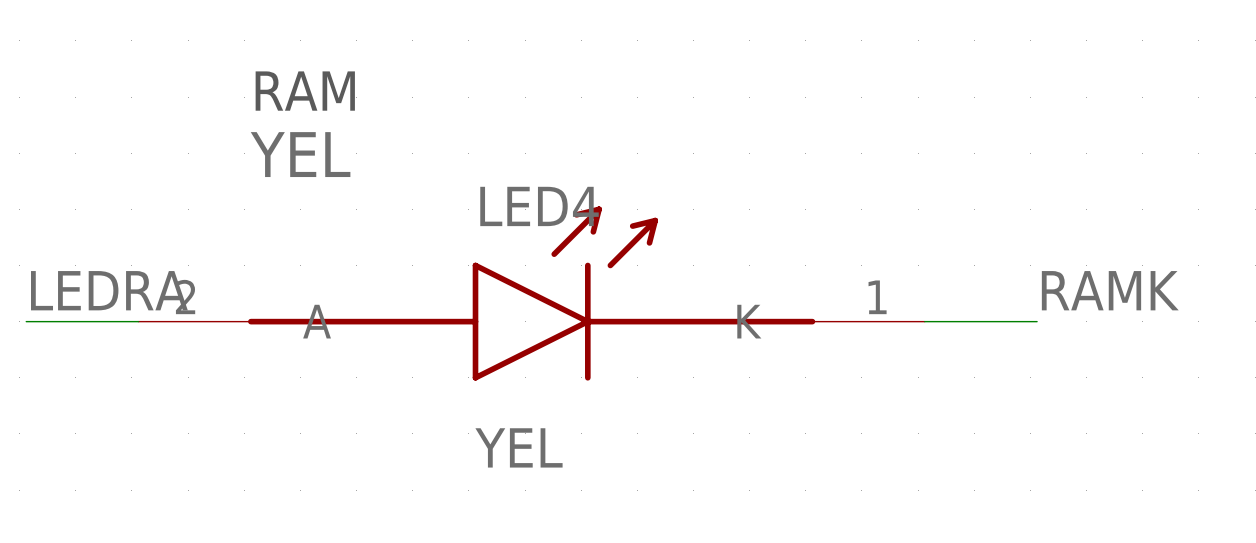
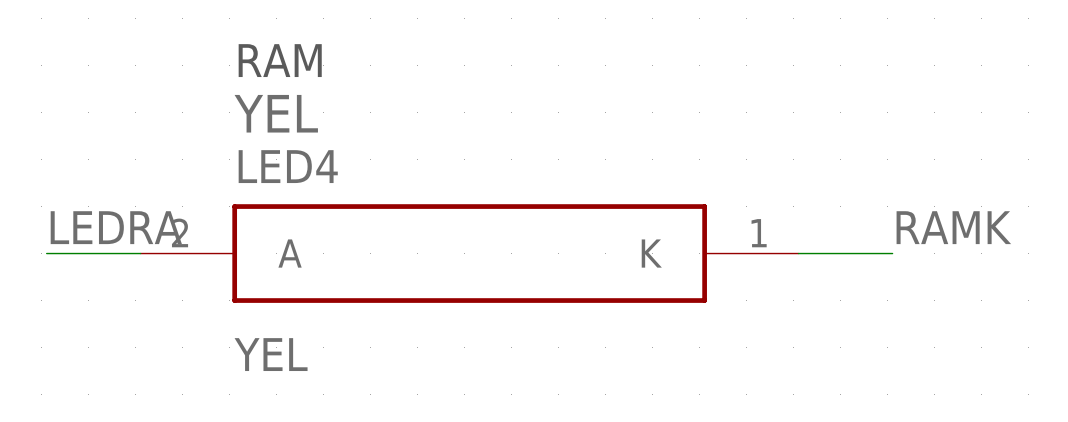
LED4 symbol: [138, 206, 925, 381] -> [140, 204, 799, 303]
LED4 name position: LED4 (539, 206) -> LED4 (288, 166)
LED4 value position: YEL (518, 447) -> YEL (271, 354)

